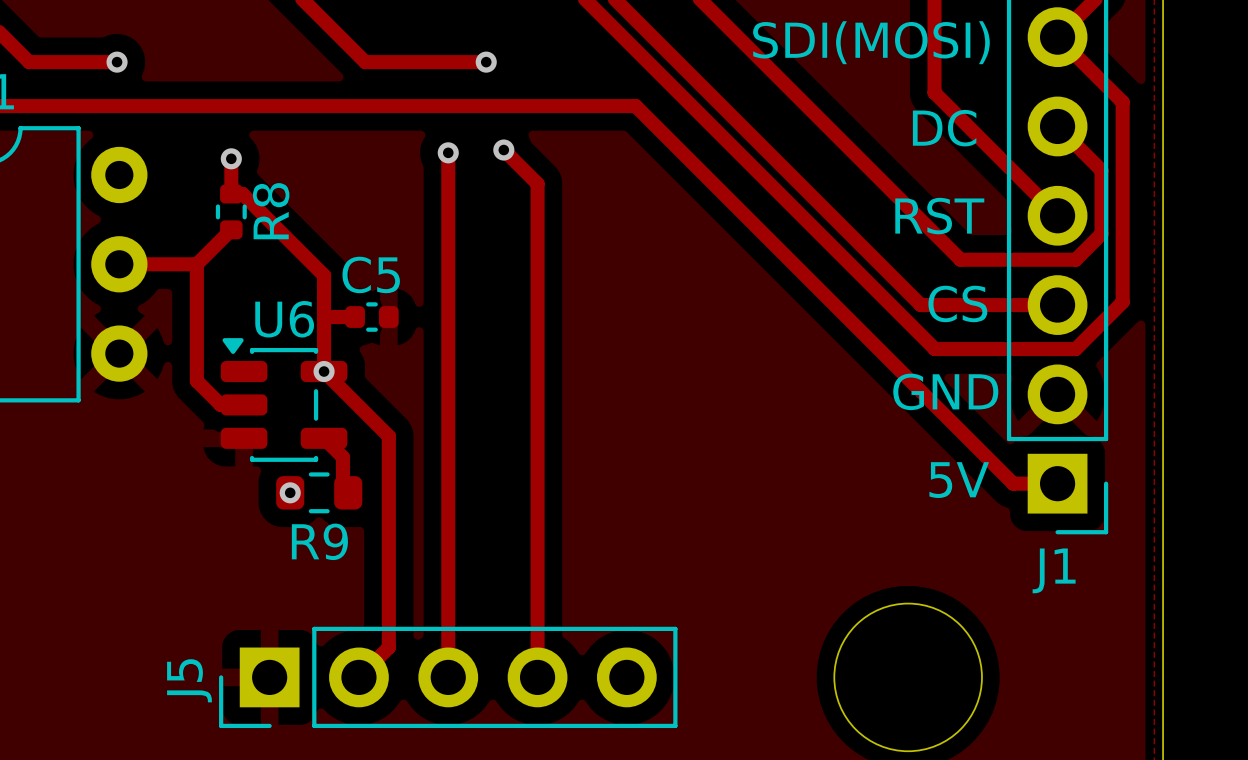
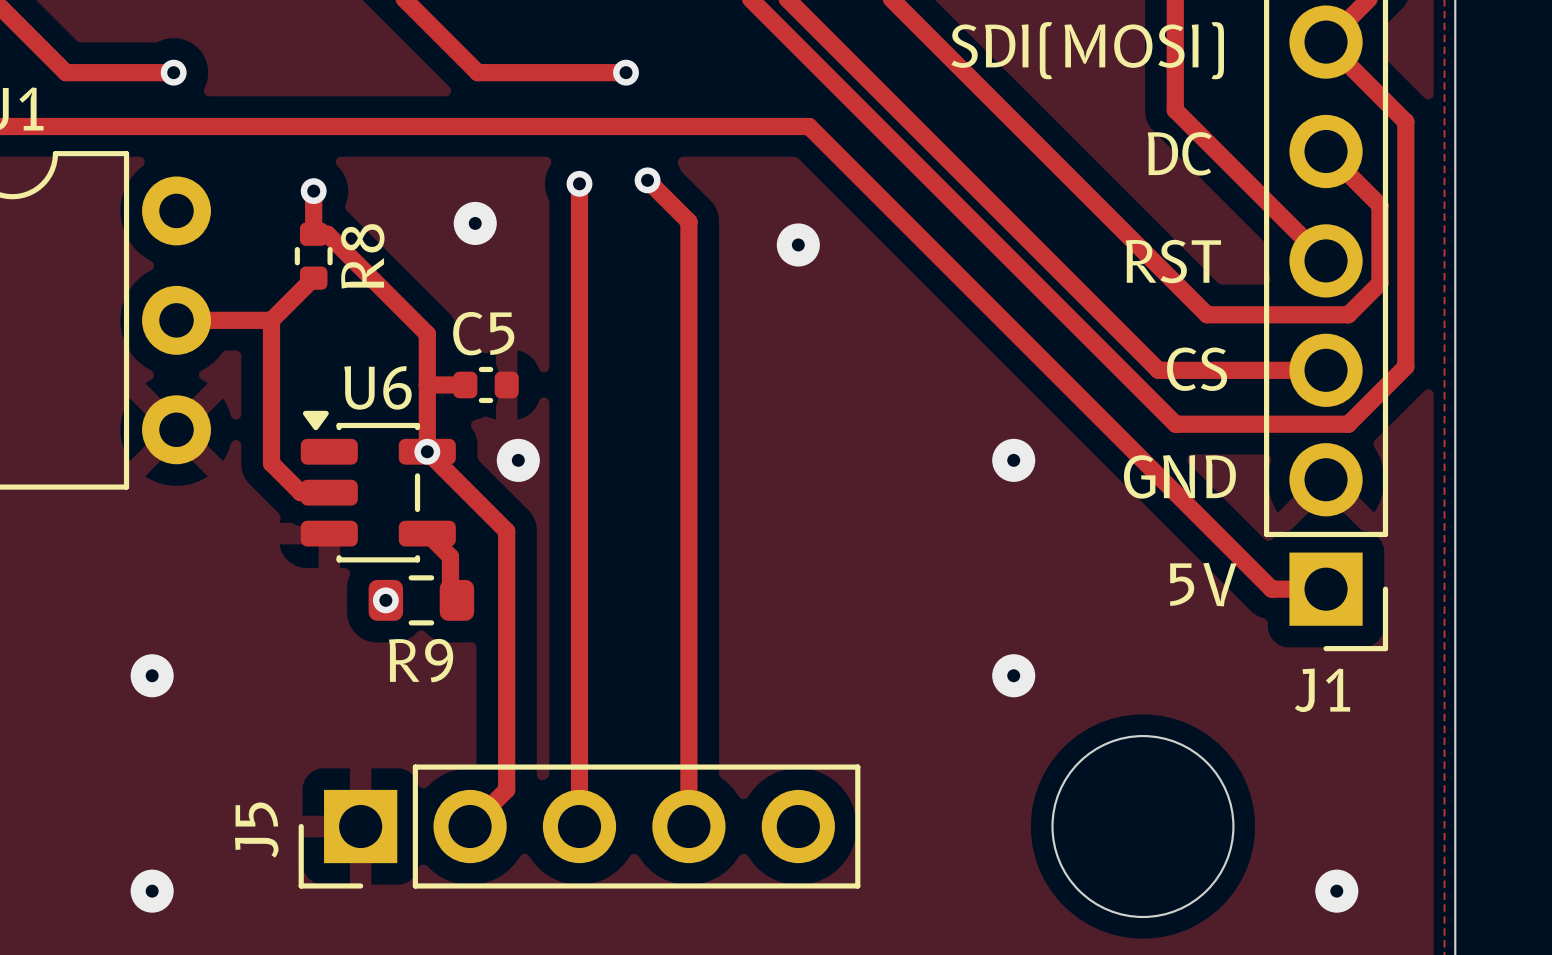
via: none -> (475, 223)
via: none -> (798, 244)
via: none -> (518, 460)
via: none -> (1013, 460)
via: none -> (152, 675)
via: none -> (1013, 675)
via: none -> (152, 891)
via: none -> (1336, 891)

